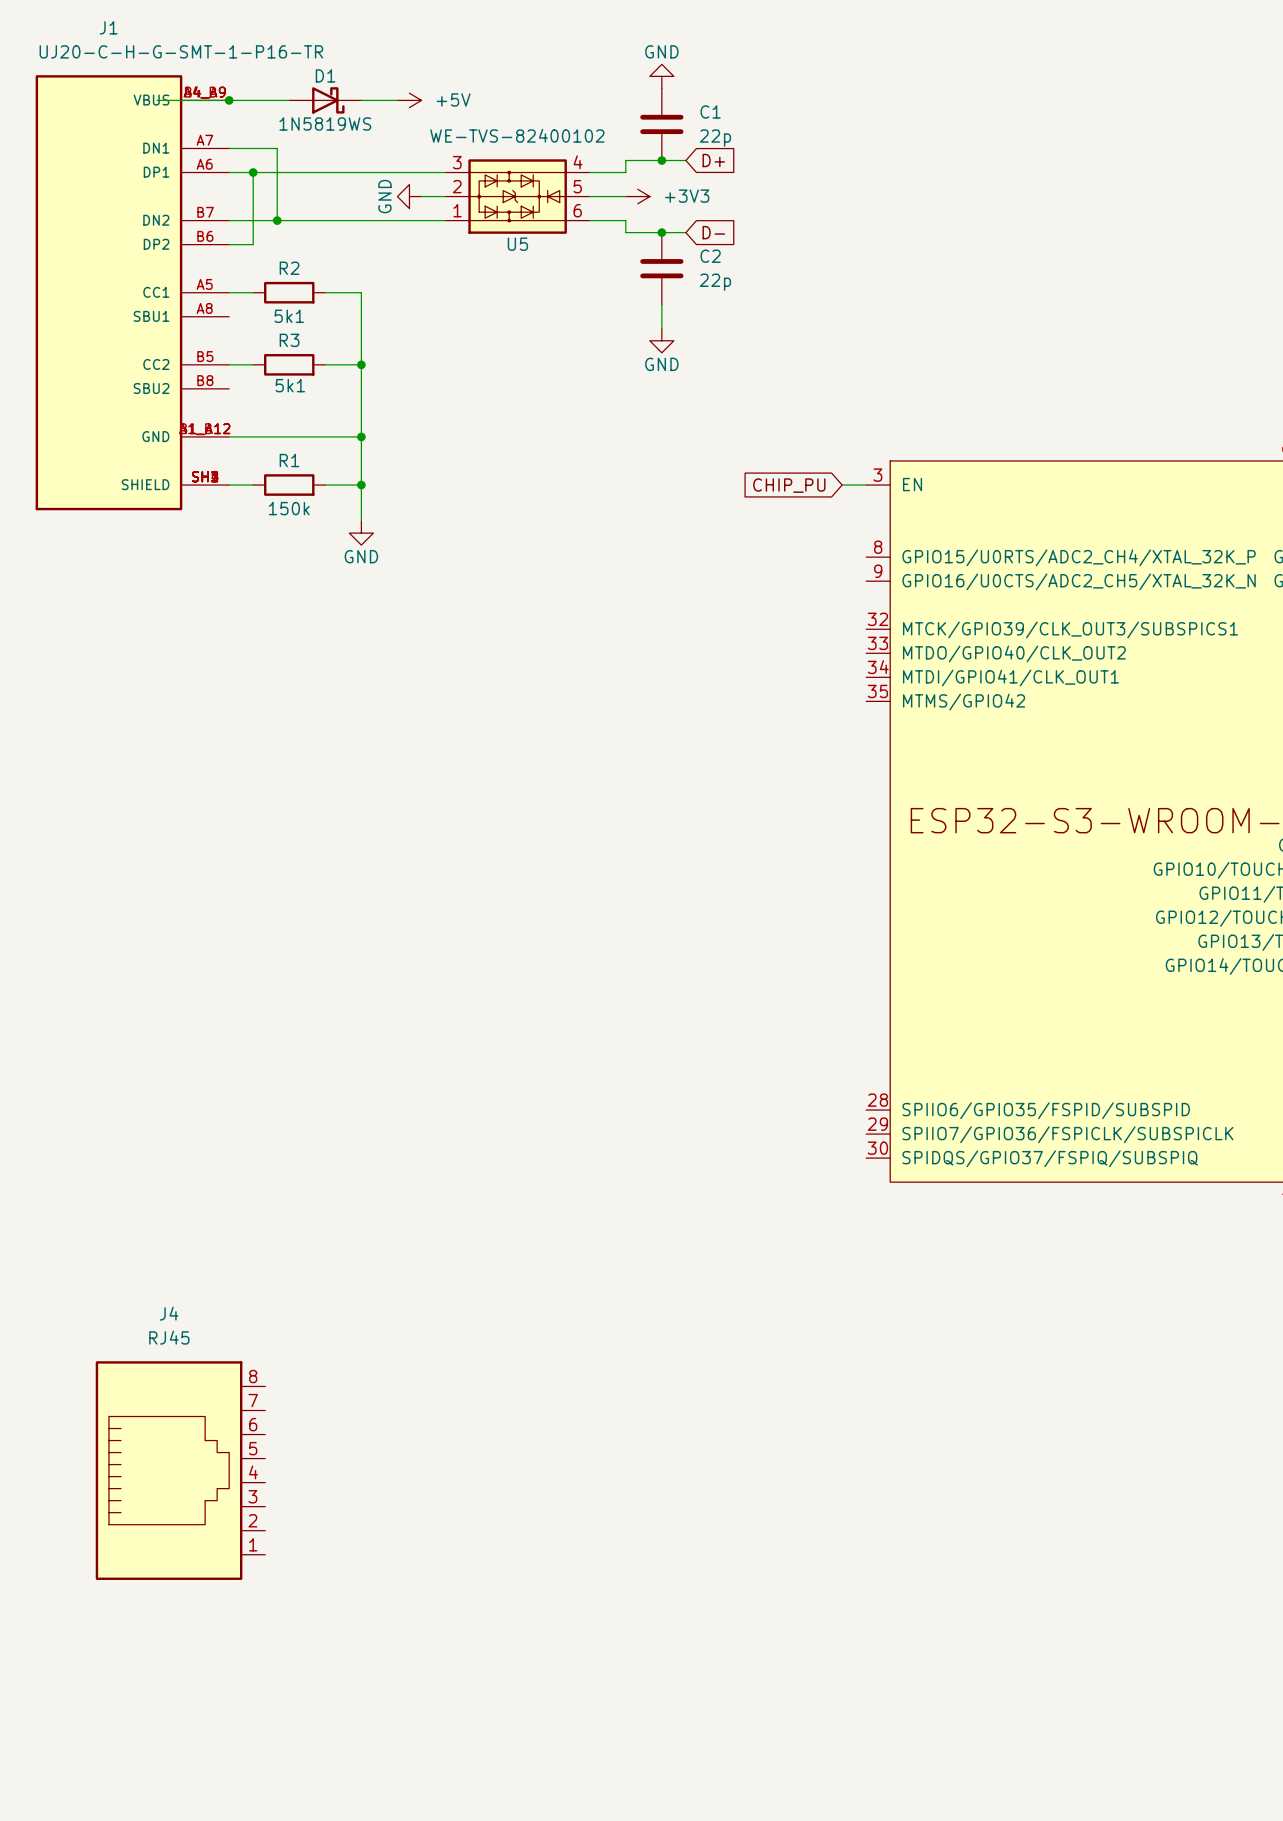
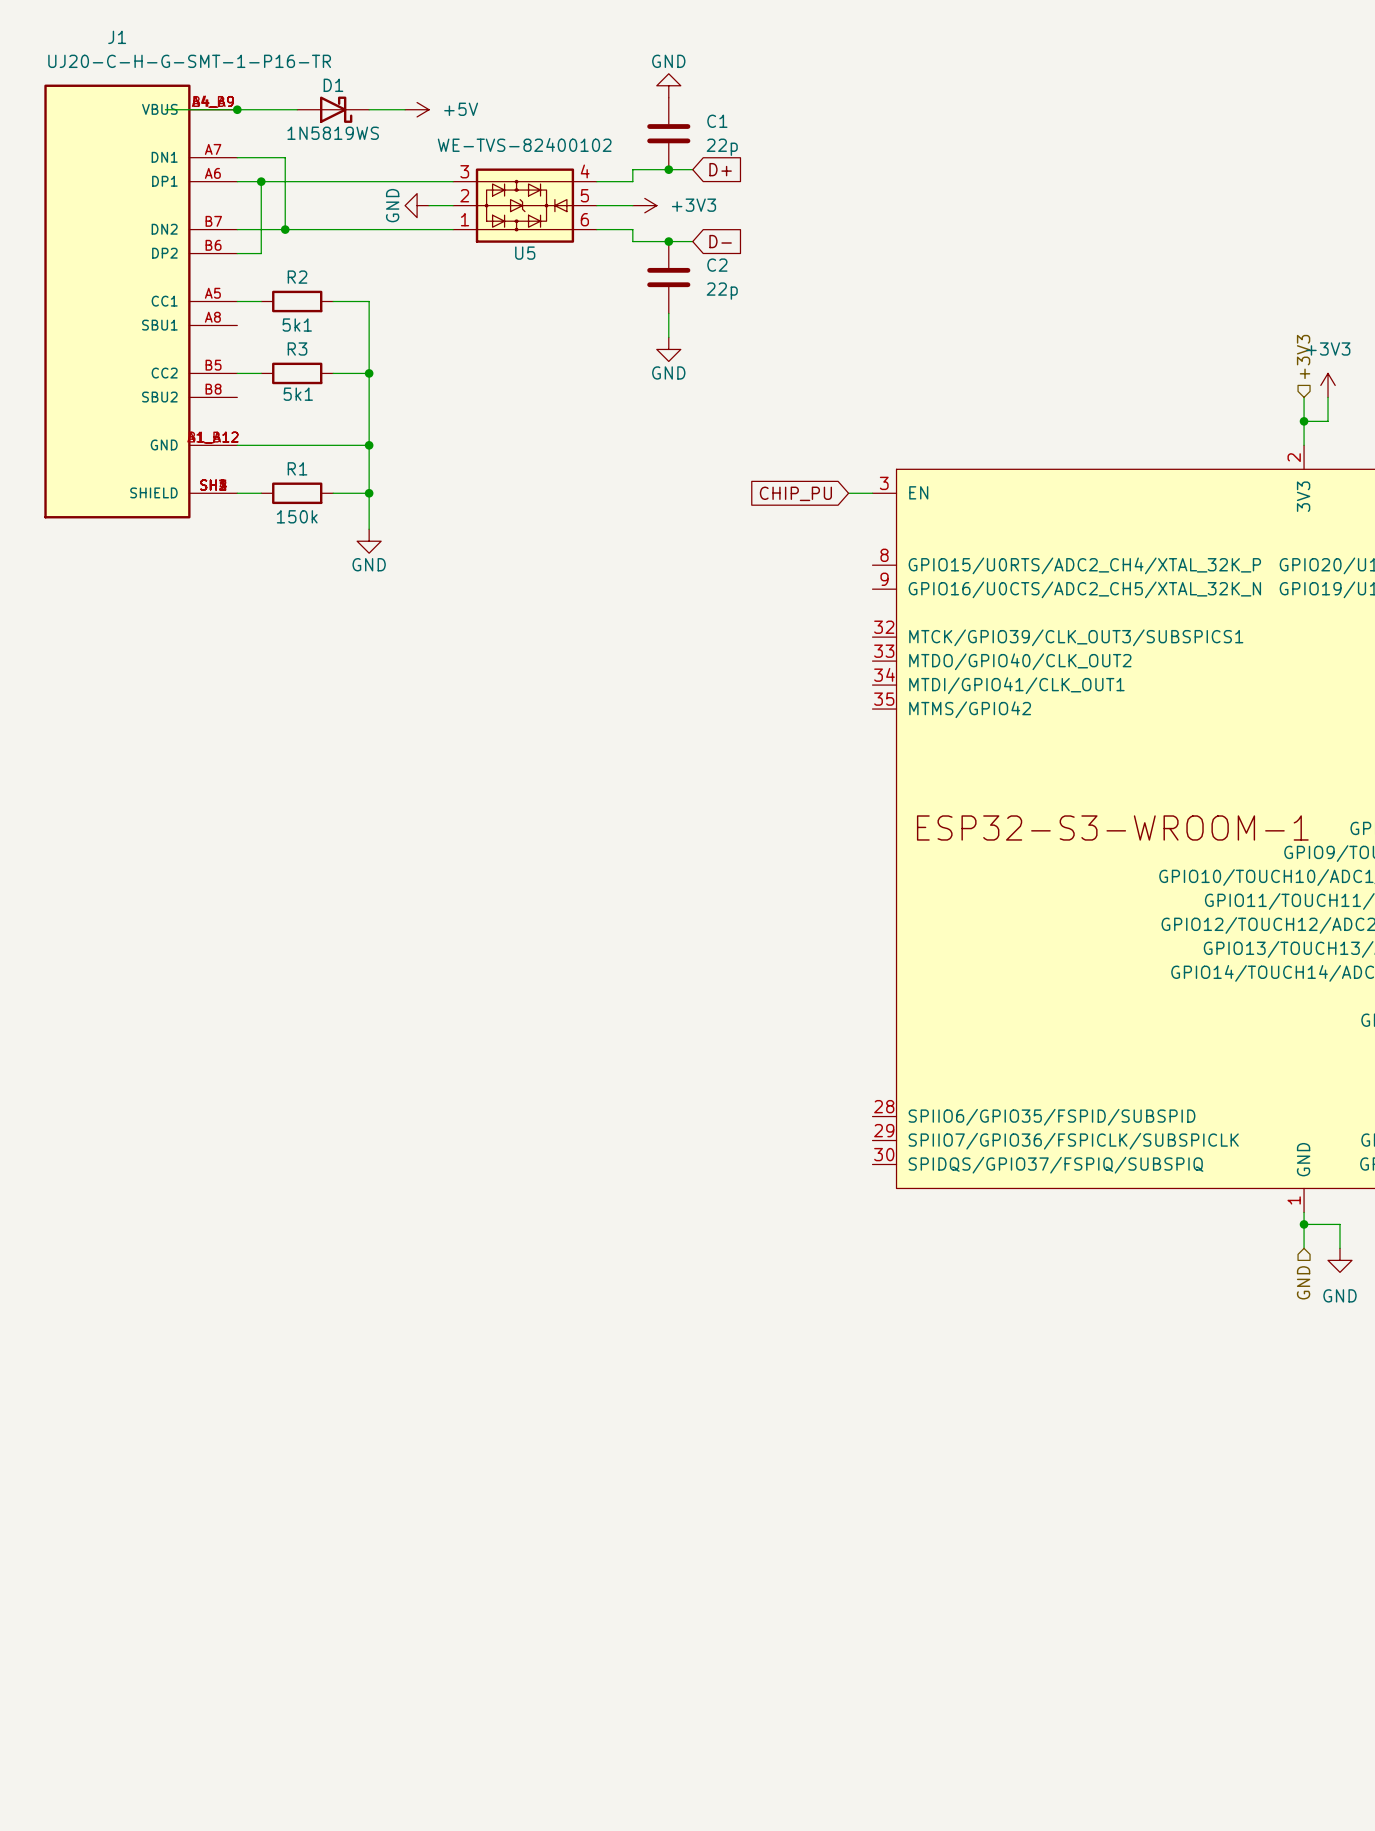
J4: RJ45 (180, 1470) -> none

